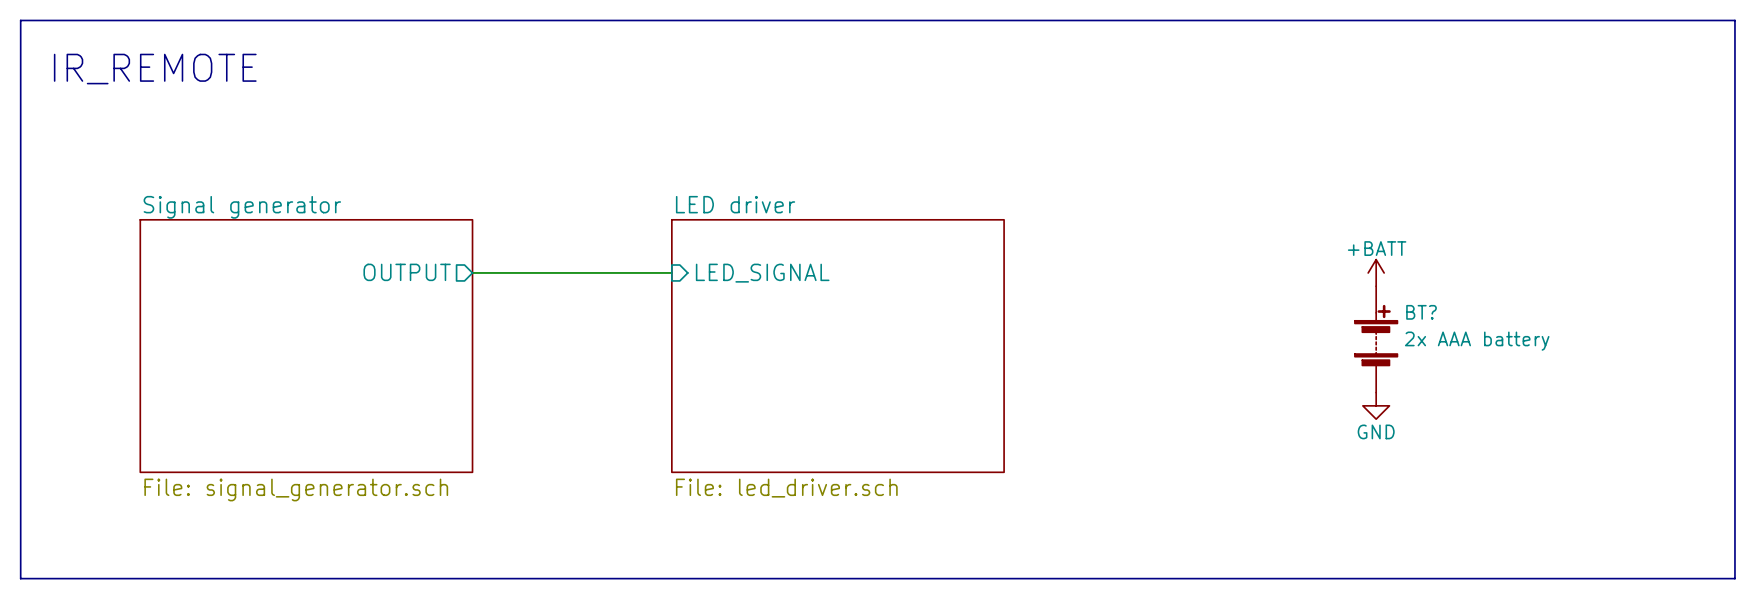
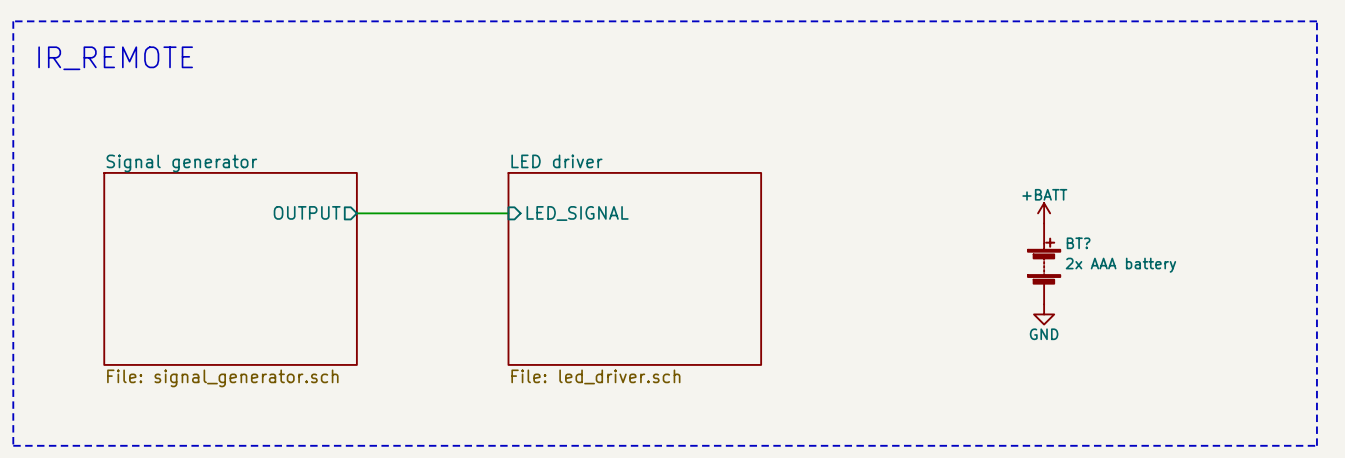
bus: (20, 20) (1734, 20) (1734, 578) (20, 578) (20, 20) -> none
line: none -> (13, 21) (1316, 21) (1316, 445) (13, 445) (13, 21)

